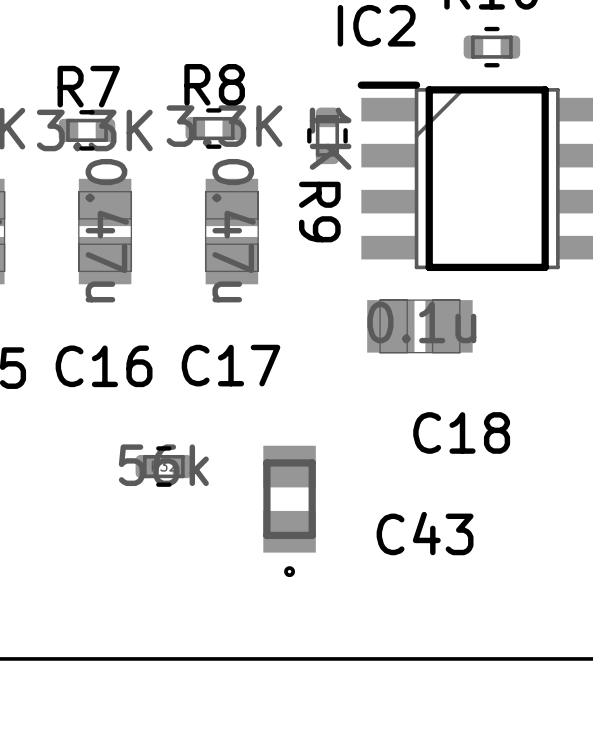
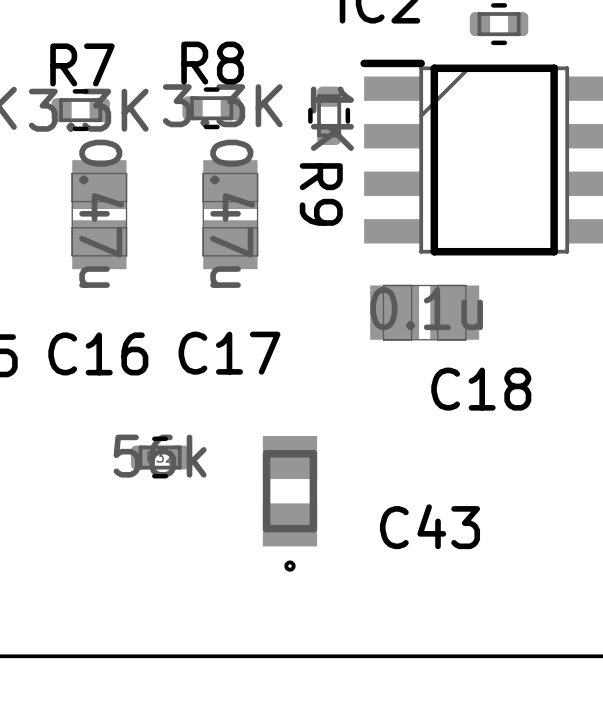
C18 name position: C18 (461, 432) -> C18 (481, 389)

